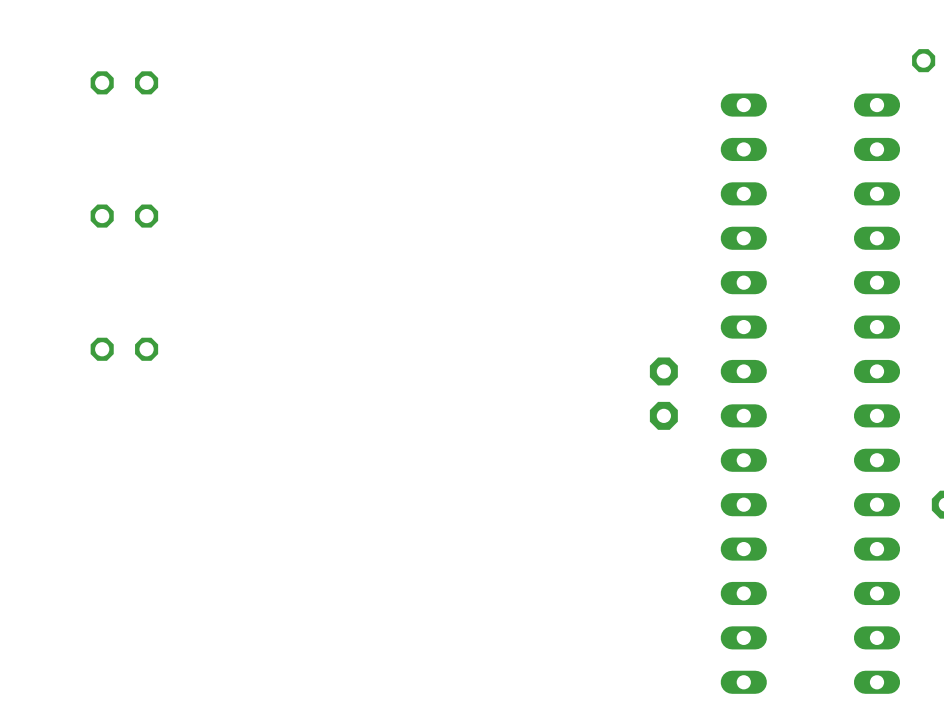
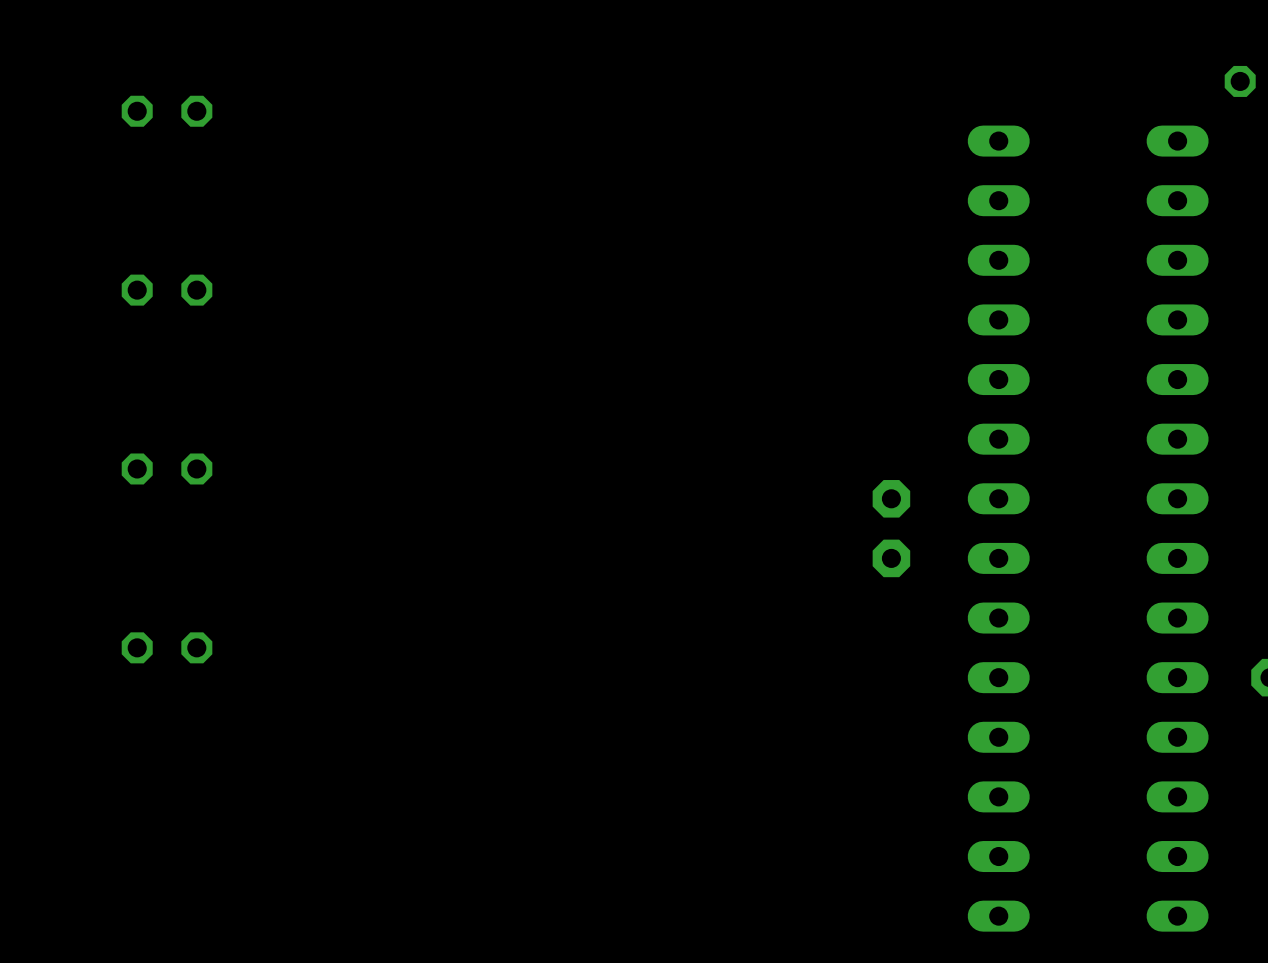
part: none -> (167, 647)

